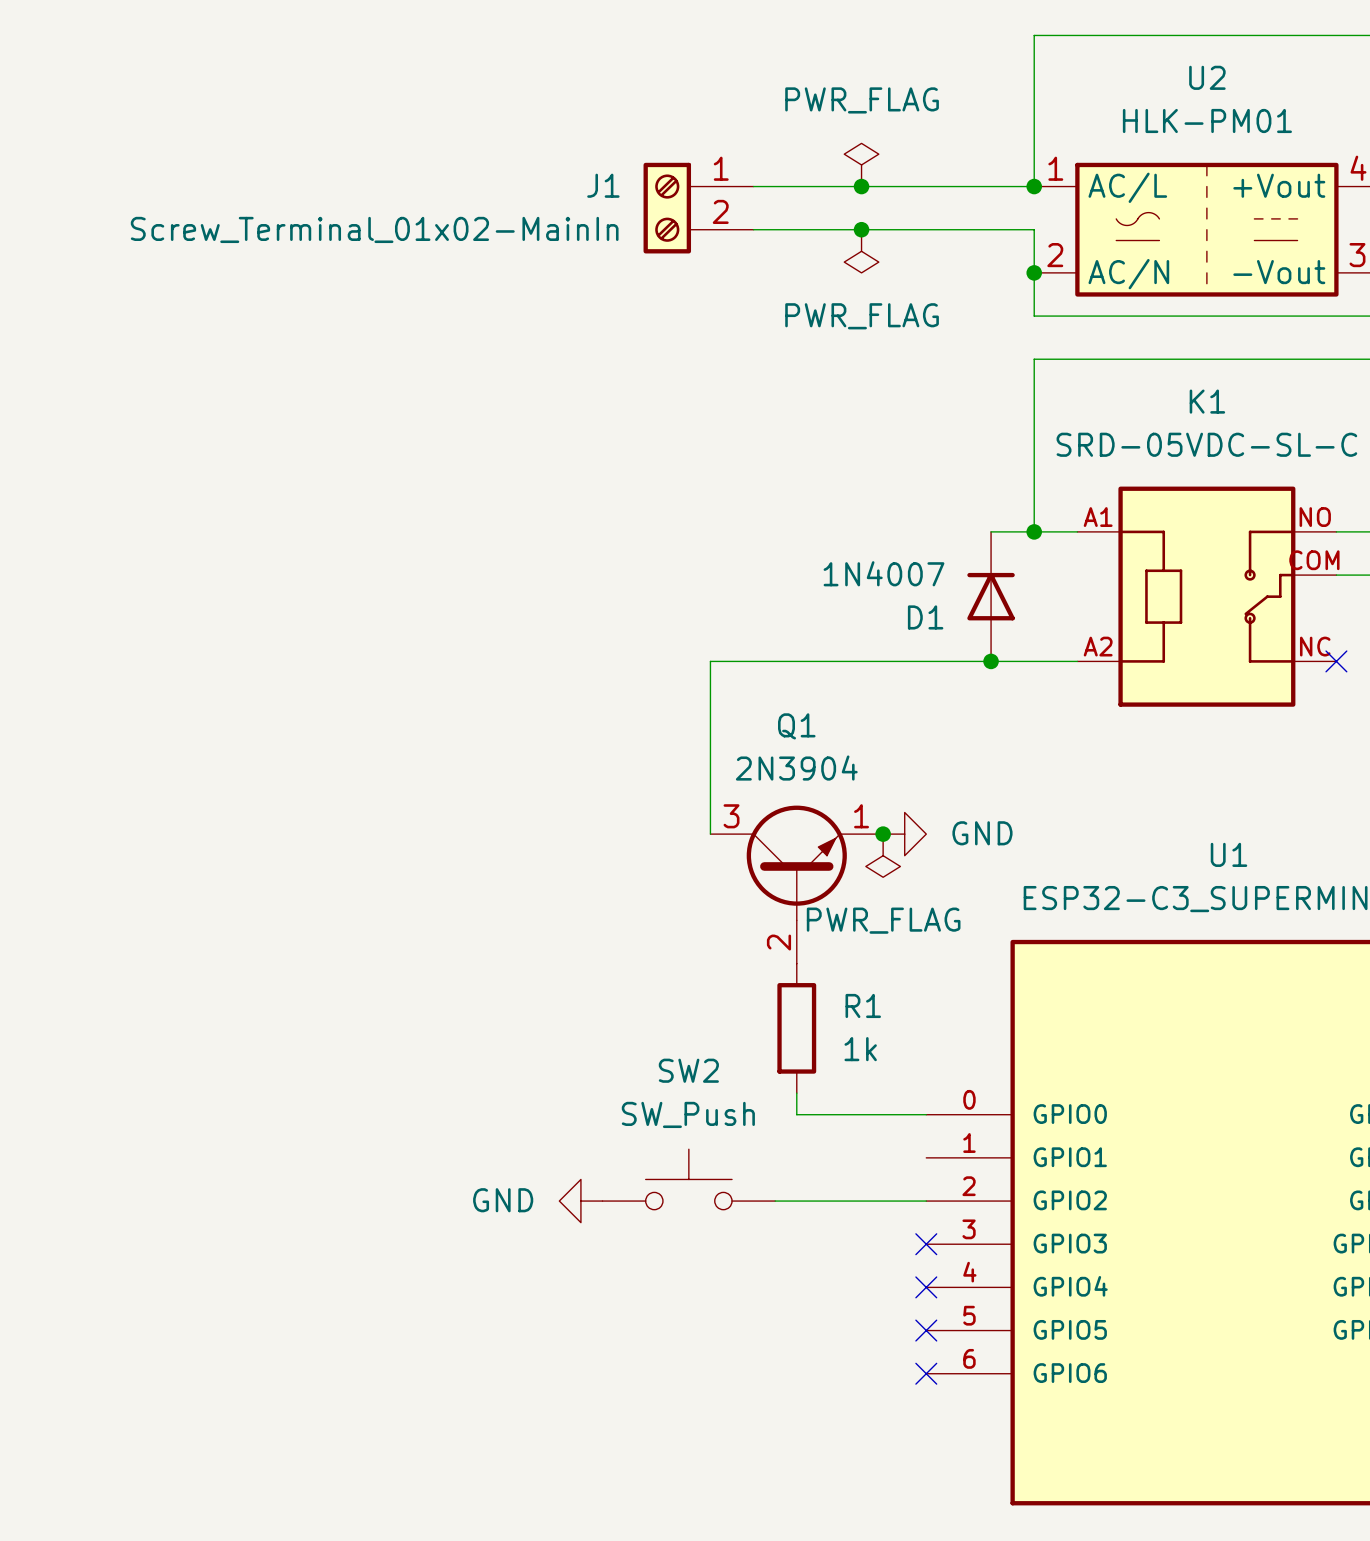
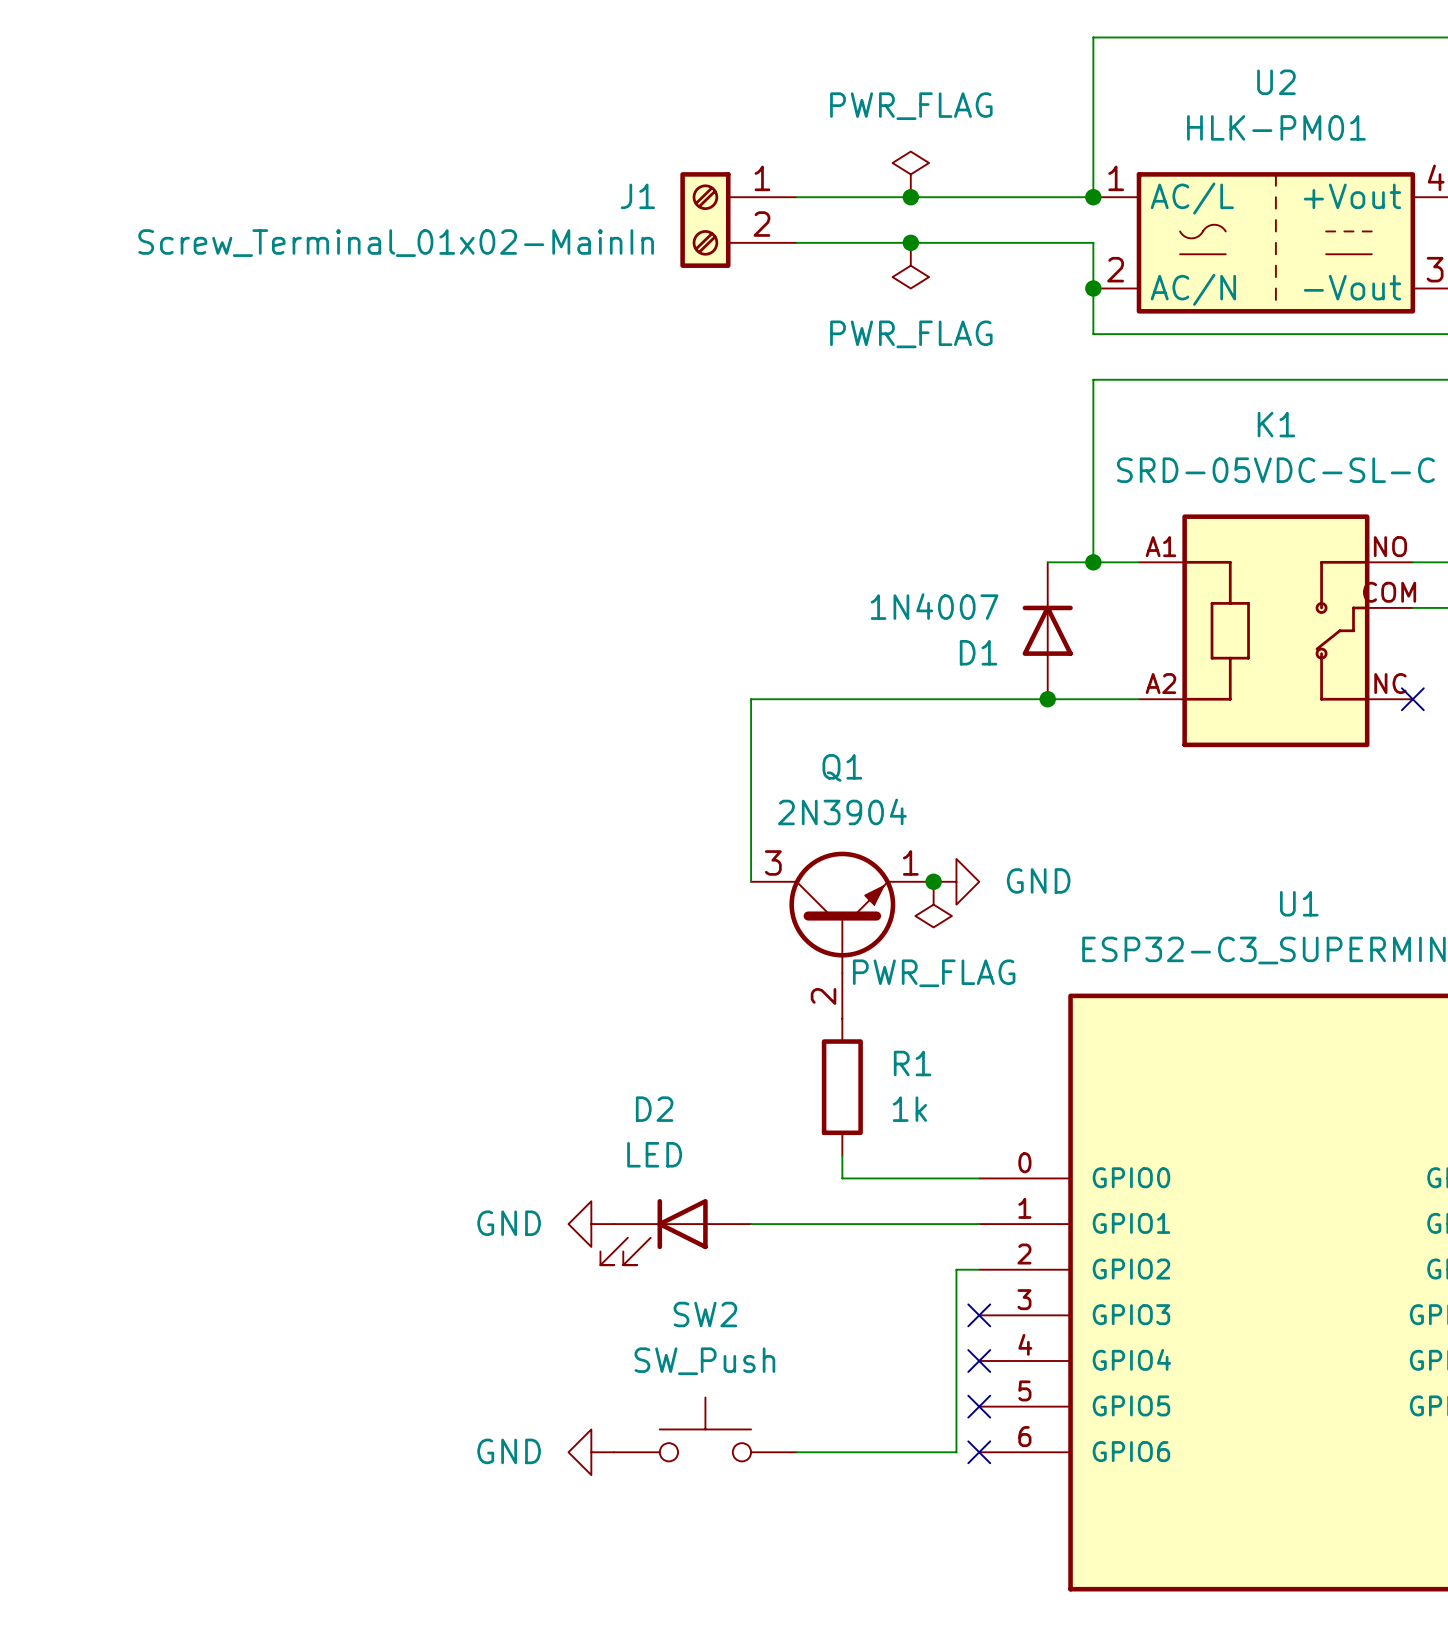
wire: none -> (751, 1224) (979, 1224)
D2: none -> LED (675, 1232)
SW2 position: (688, 1179) -> (705, 1429)
power symbol position: GND (580, 1201) -> GND (591, 1224)
wire: (775, 1201) (904, 1201) -> (796, 1452) (956, 1452) (956, 1269)
power symbol: none -> GND (591, 1452)

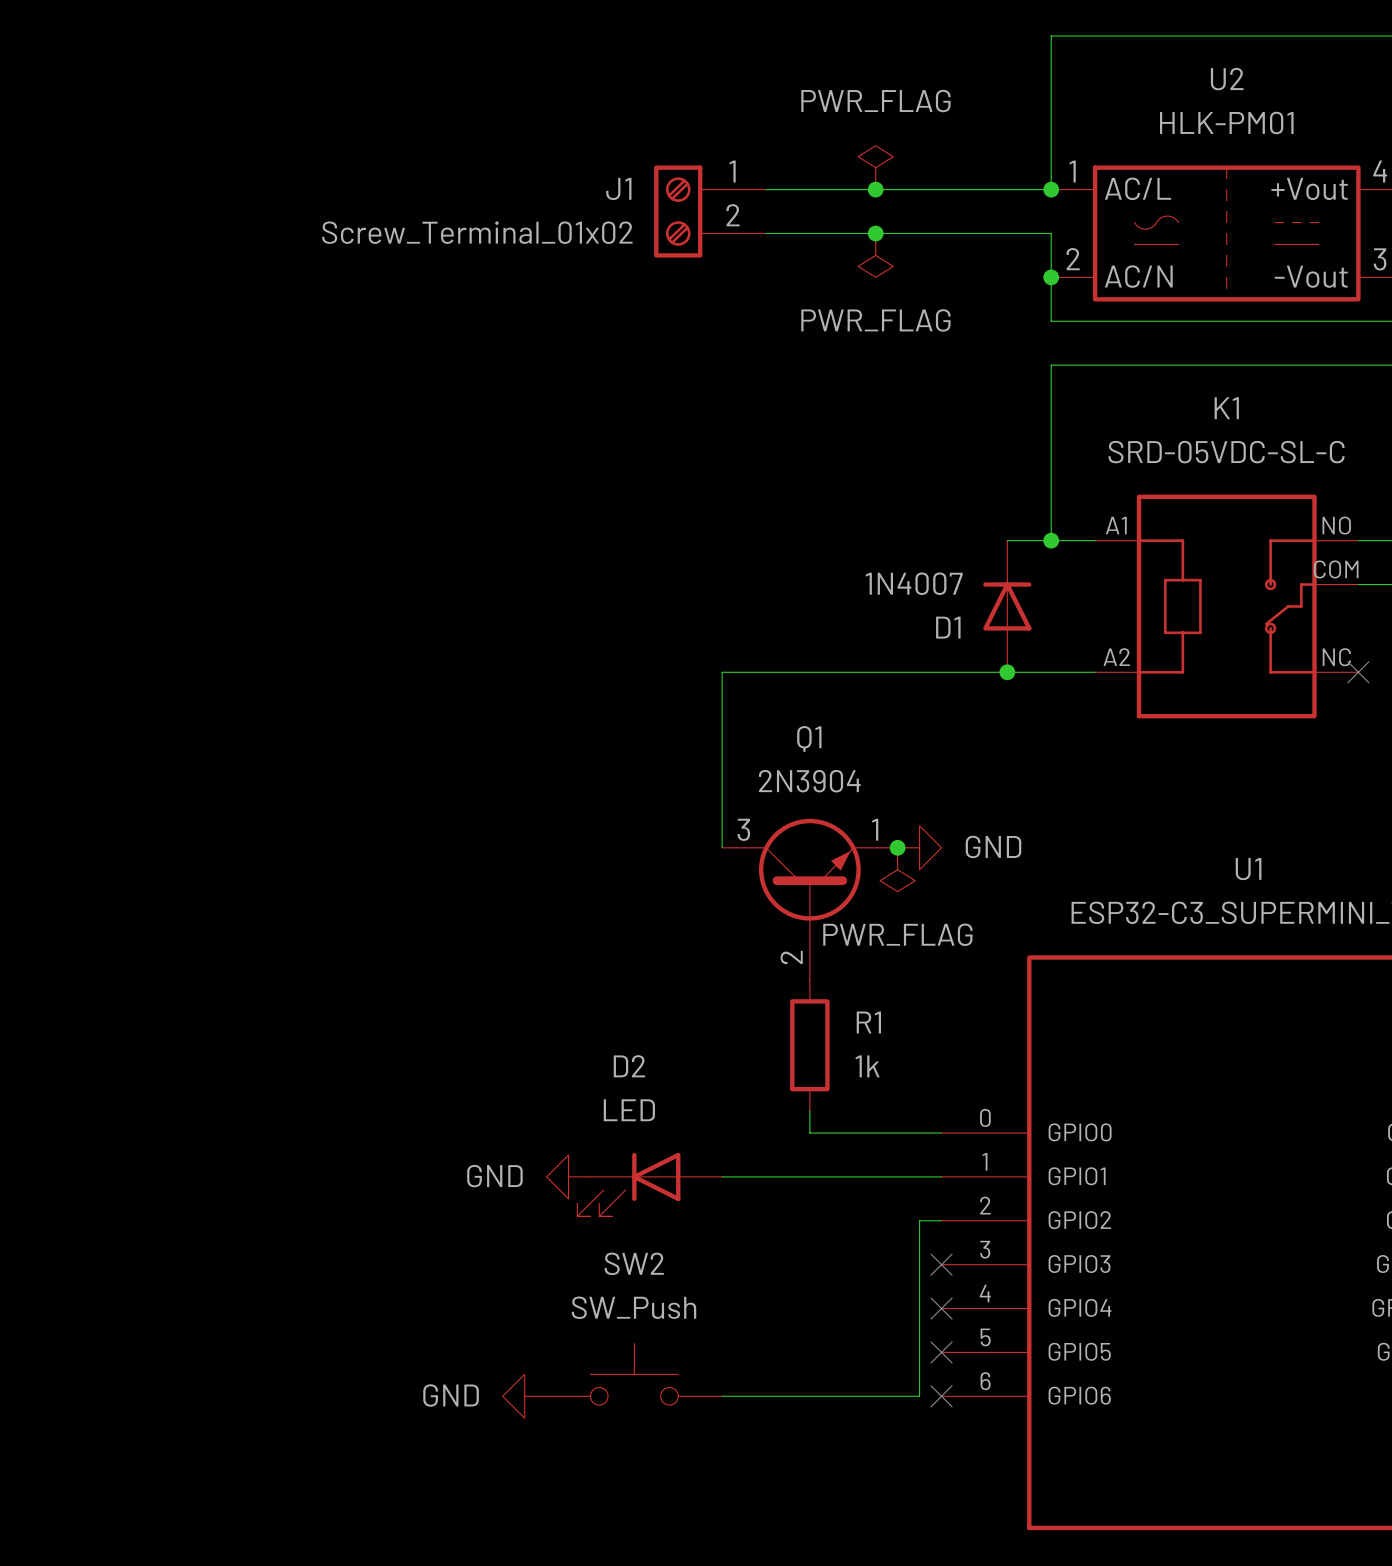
J1 value: Screw_Terminal_01x02-MainIn (396, 243) -> Screw_Terminal_01x02 (477, 232)
SW2 position: (705, 1429) -> (634, 1374)
power symbol position: GND (591, 1452) -> GND (524, 1396)

